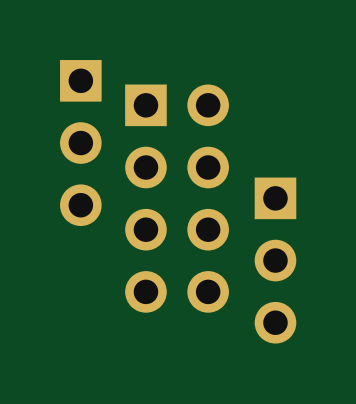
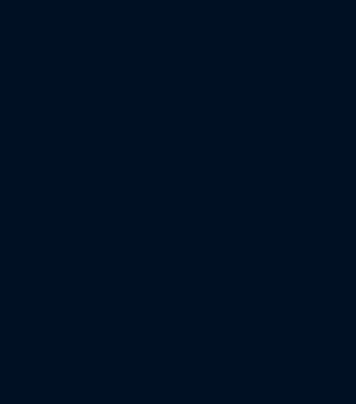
part: (80, 143) -> none
part: (177, 198) -> none
part: (275, 260) -> none

